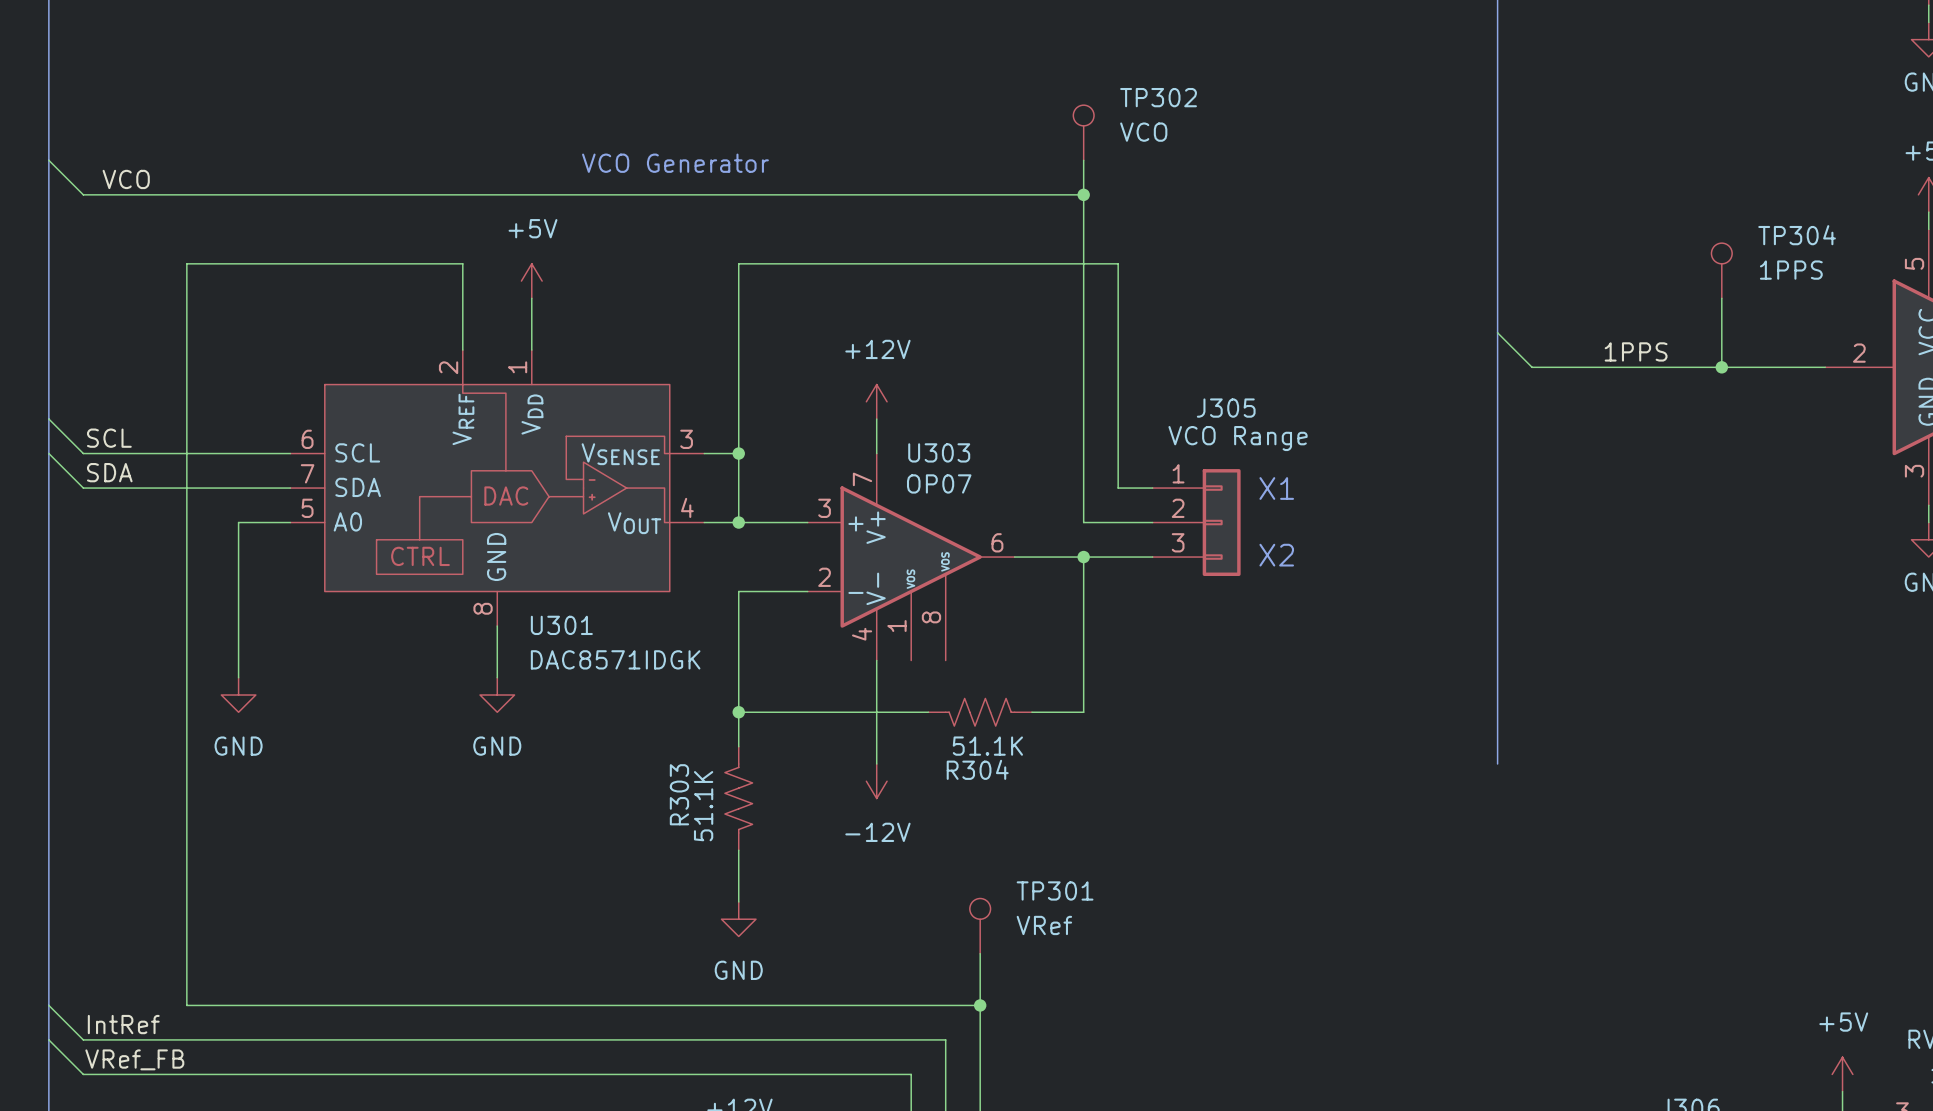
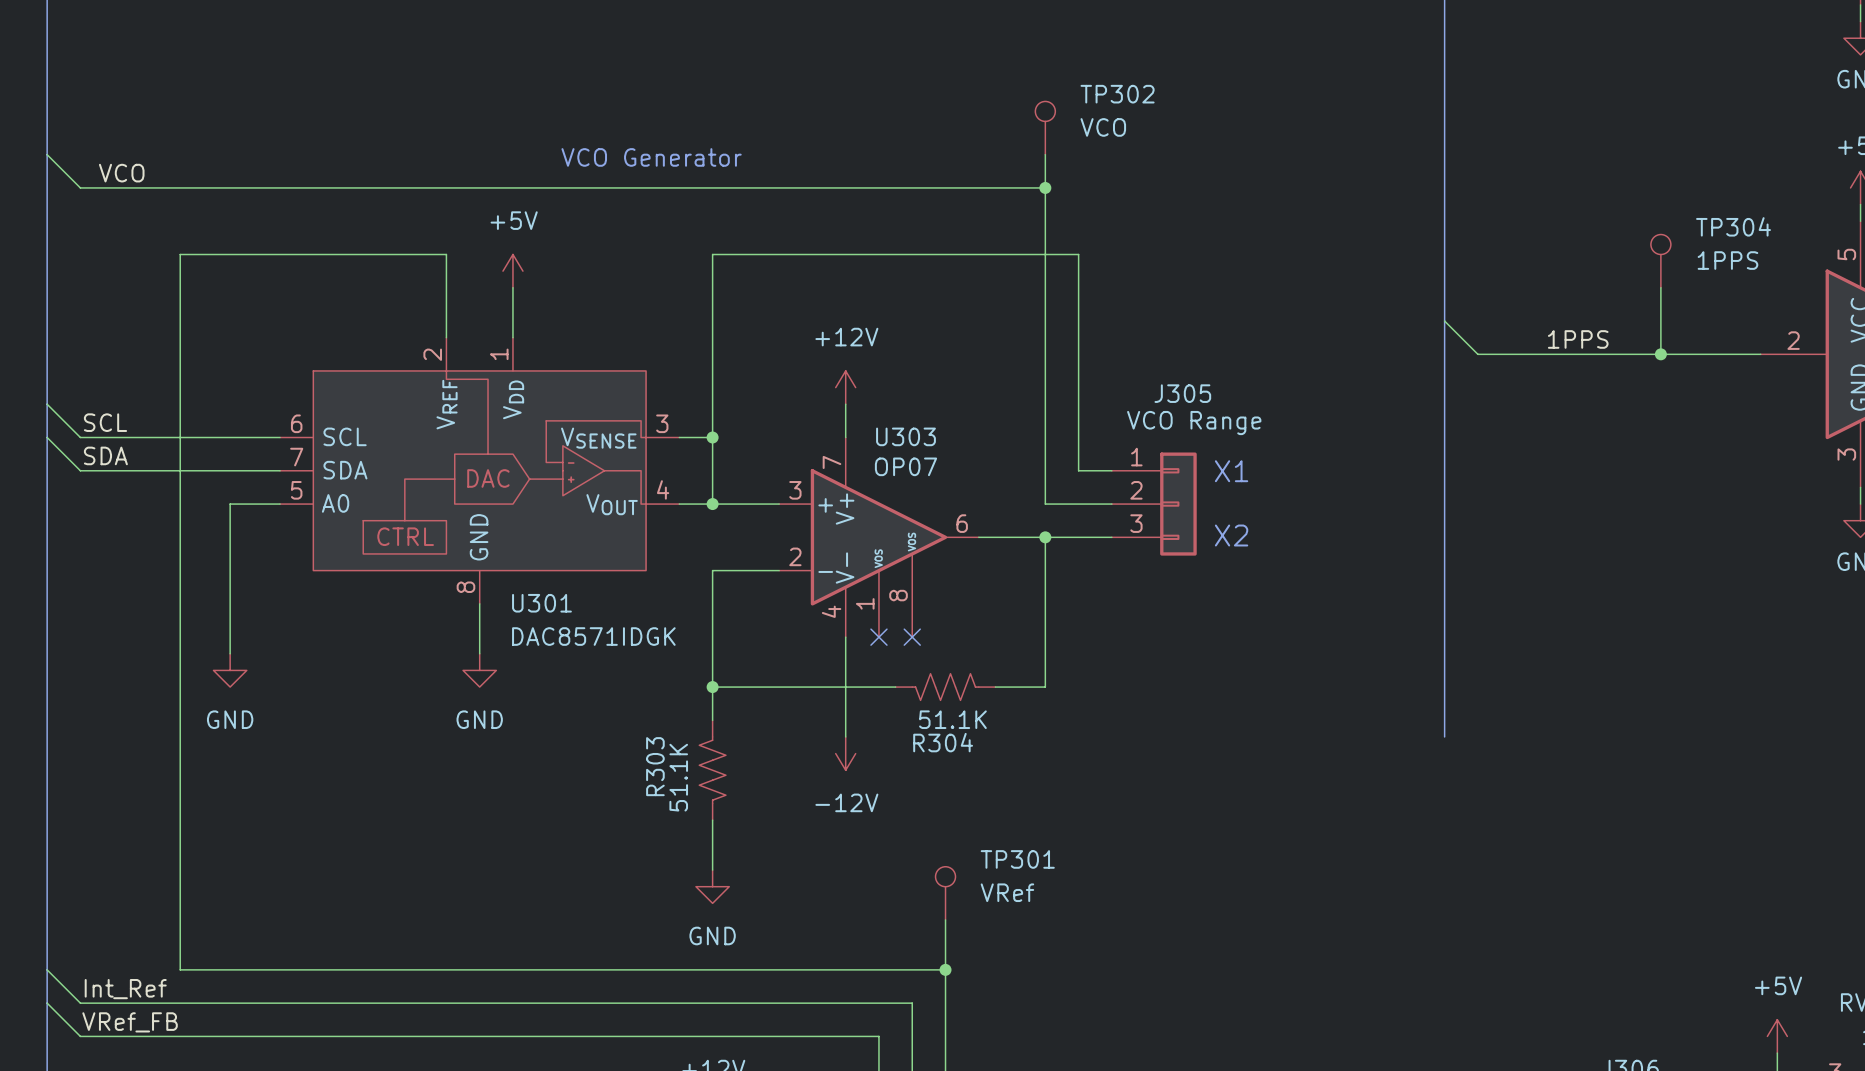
no-connect mark: none -> (878, 637)
no-connect mark: none -> (912, 637)
label: IntRef (123, 1024) -> Int_Ref (125, 989)

